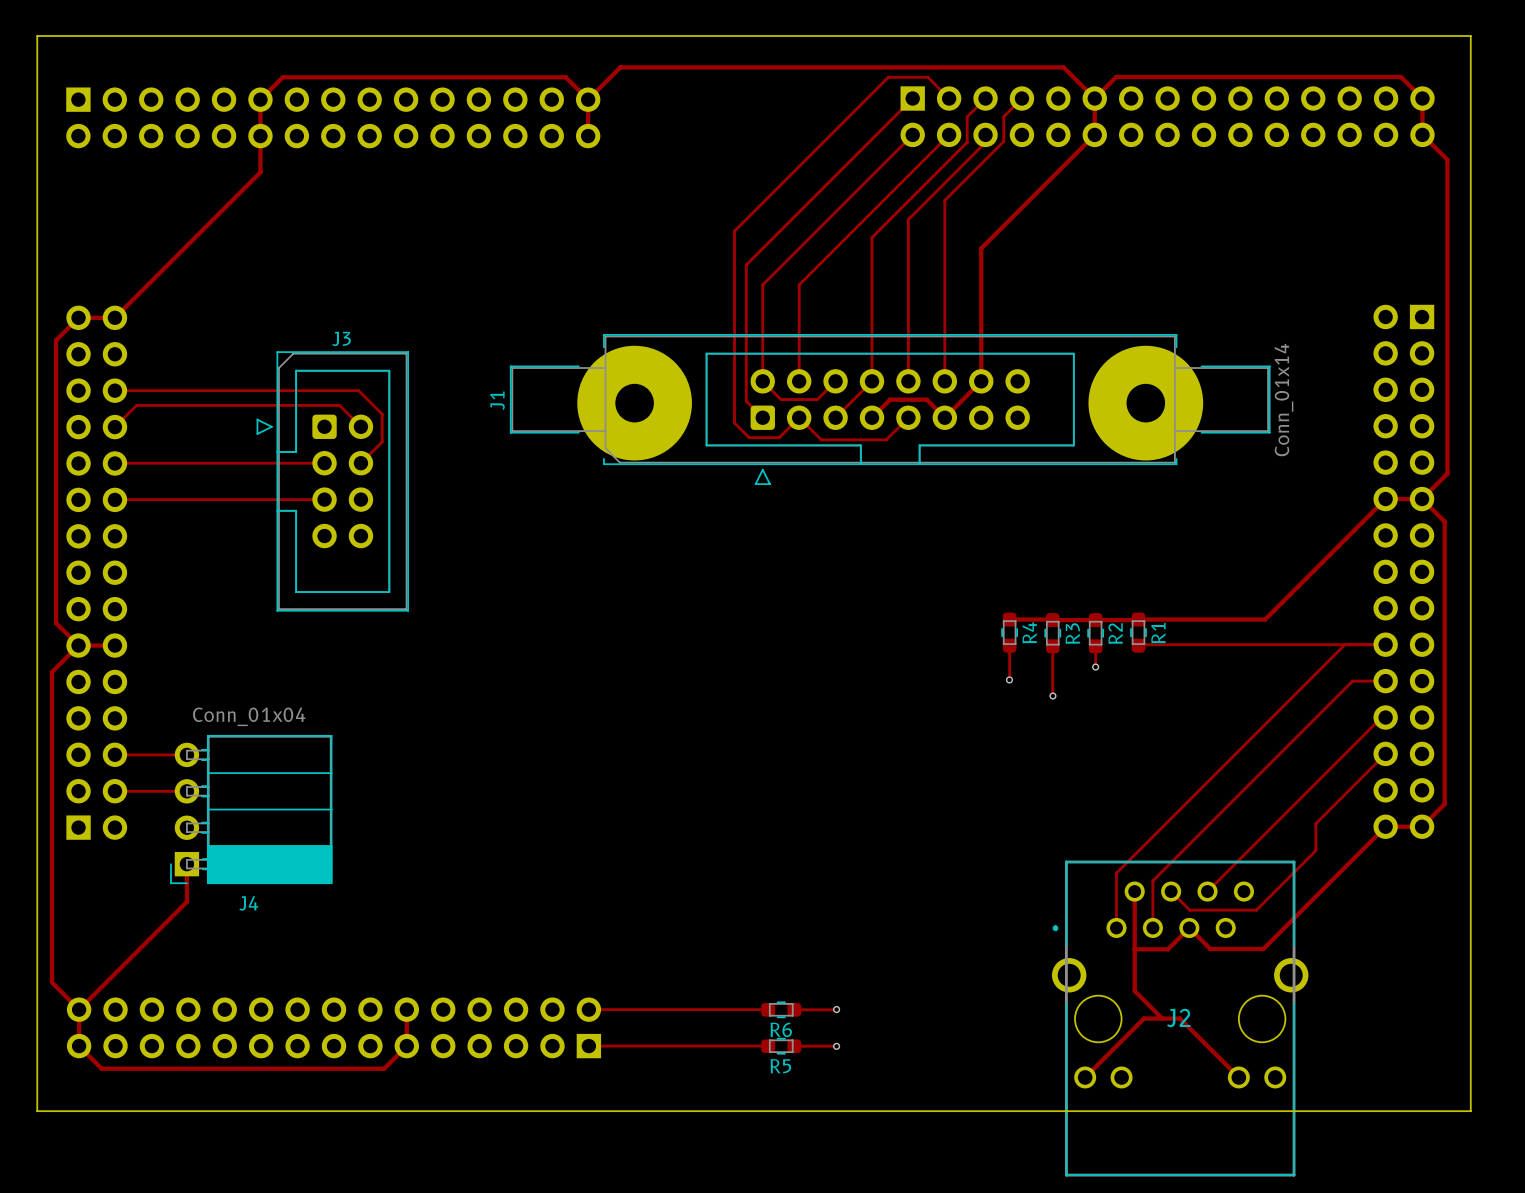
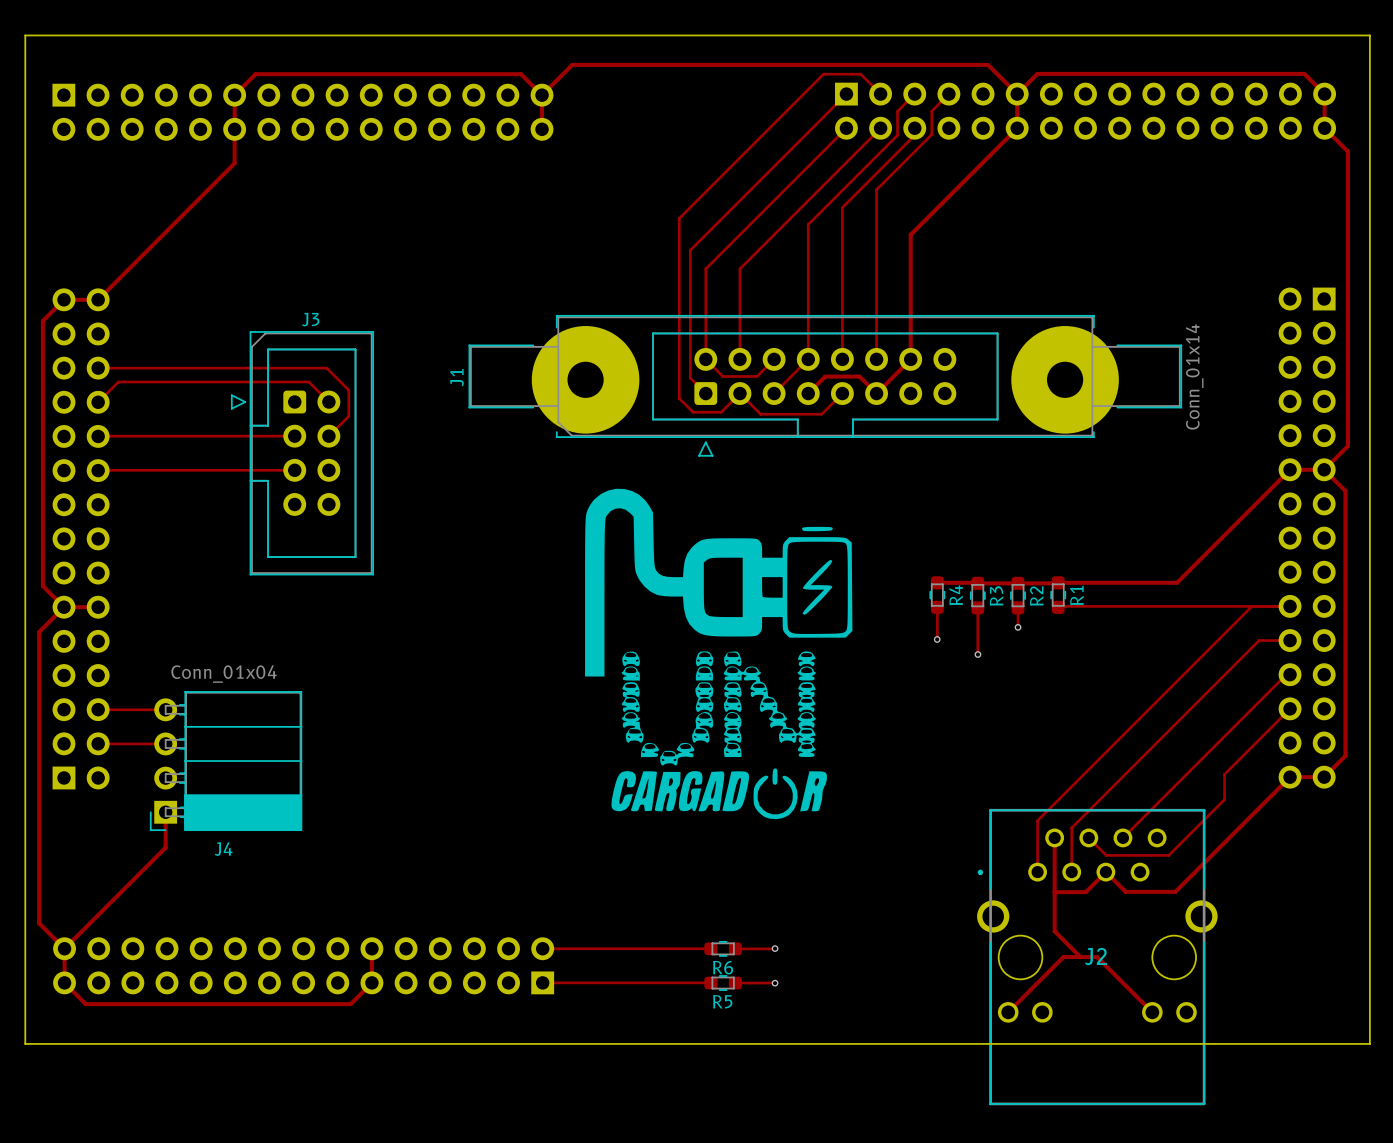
drawing: none -> [585, 488, 853, 820]

